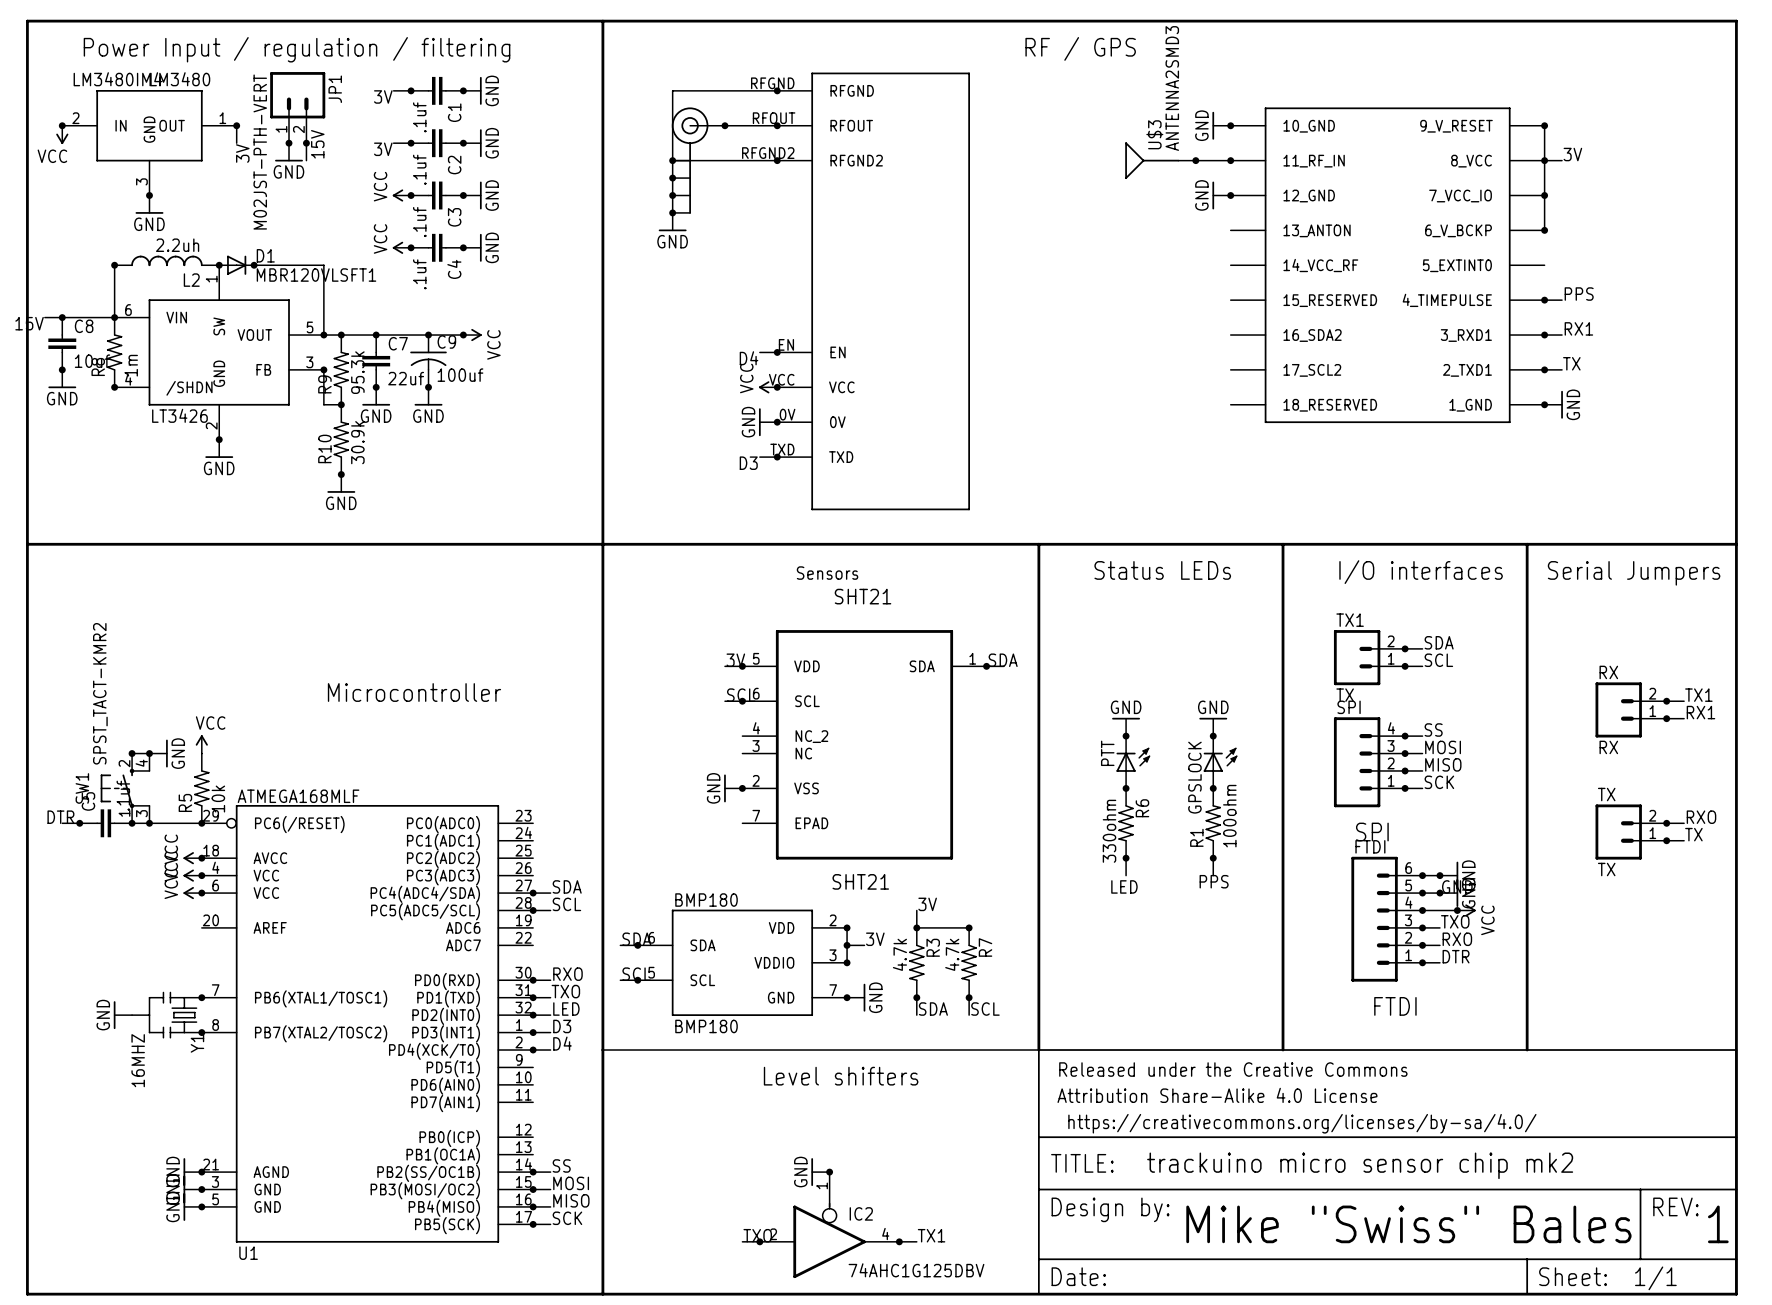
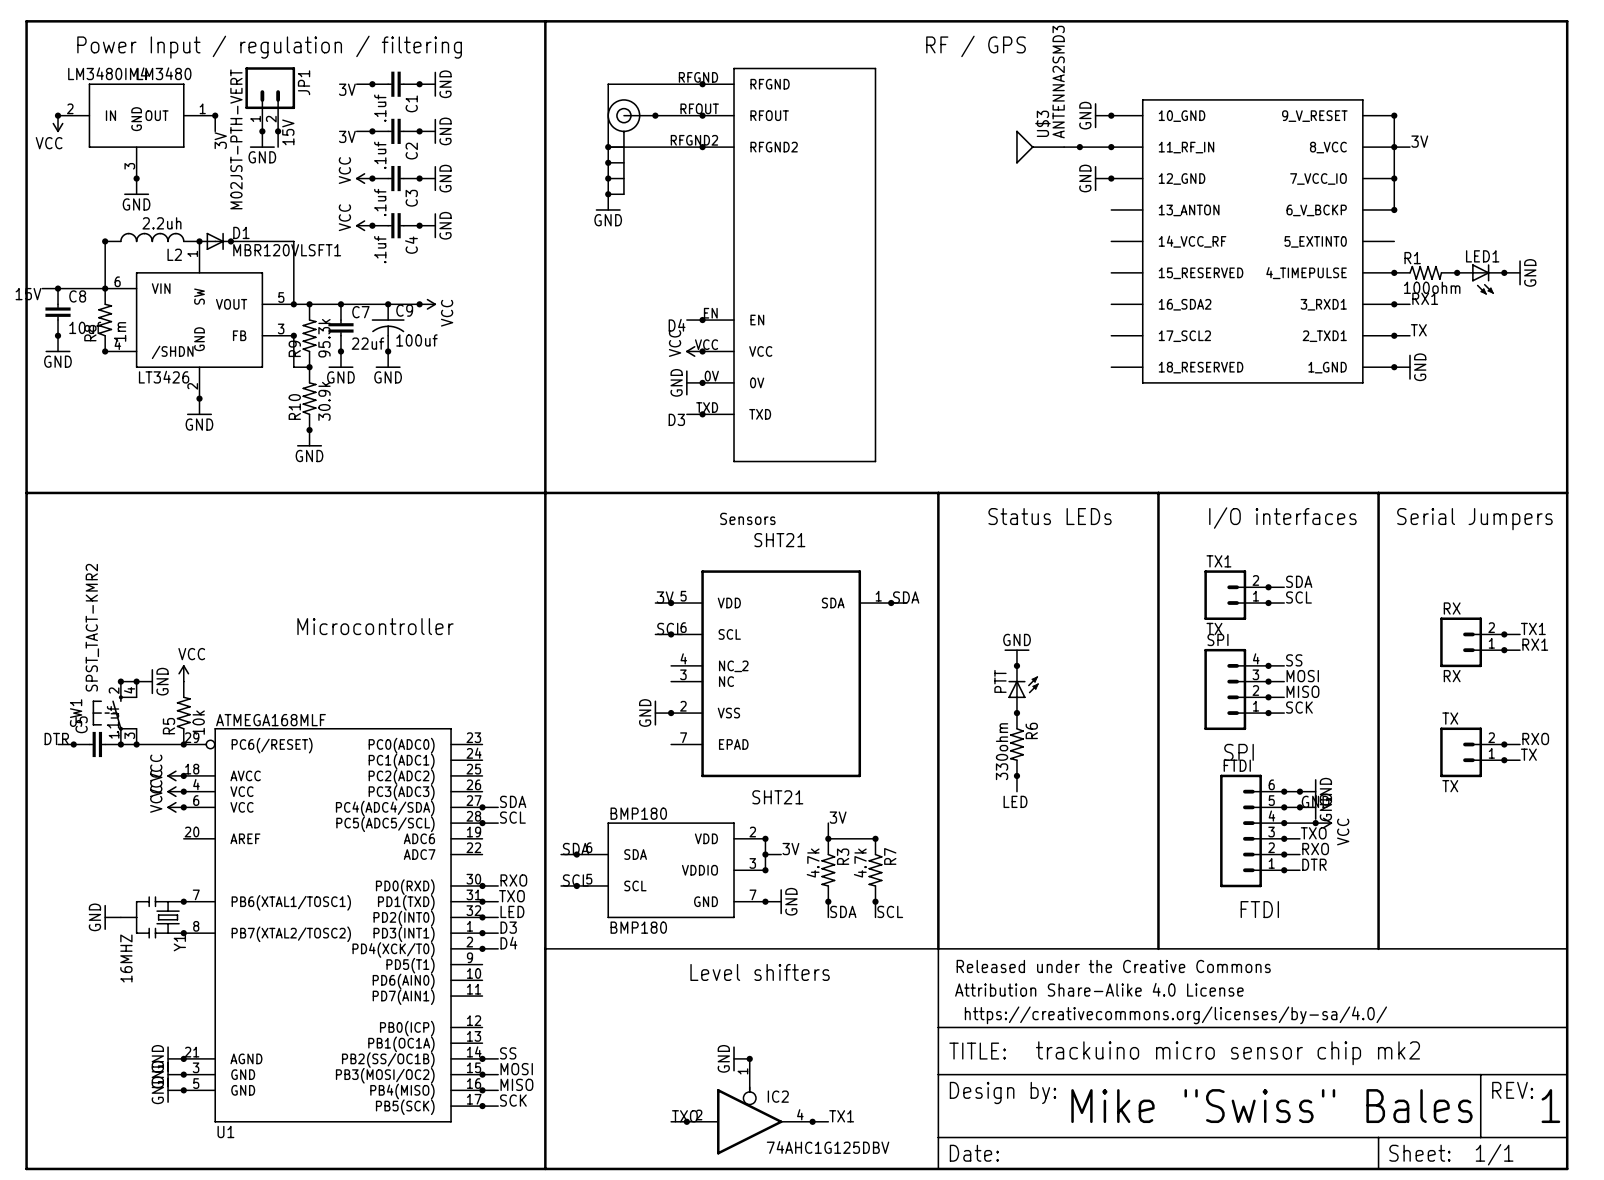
label: PPS (1579, 294) -> none
junction: none -> (1457, 272)
junction: none -> (1504, 272)
power symbol: none -> GND (1512, 272)
LED1: none -> (1480, 279)
power symbol: GND (1213, 726) -> none
junction: (1213, 736) -> none
GPSLOCK: (1220, 762) -> none
junction: (1213, 788) -> none
R1 rotation: 0° (1213, 823) -> 90° clockwise (1425, 272)
R1 position: (1213, 823) -> (1425, 272)
wire: (1213, 858) (1213, 875) -> none
junction: (1213, 858) -> none
label: PPS (1214, 881) -> none

